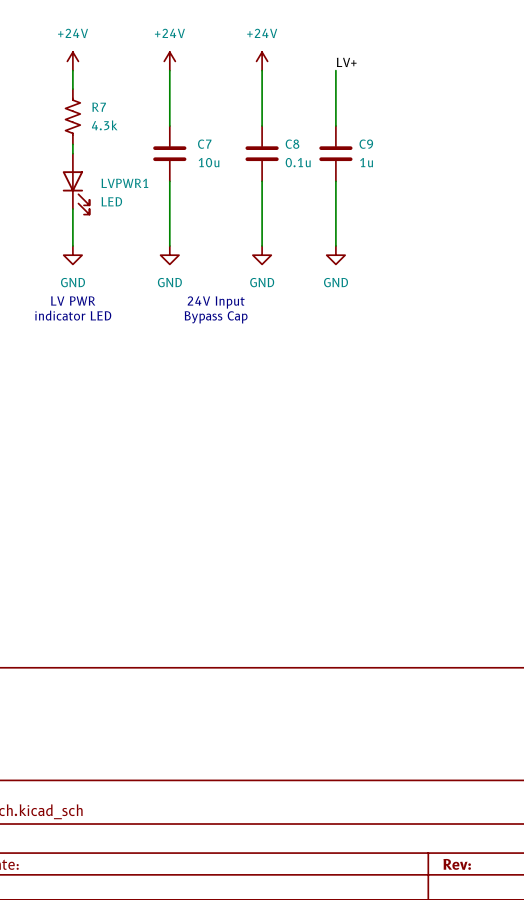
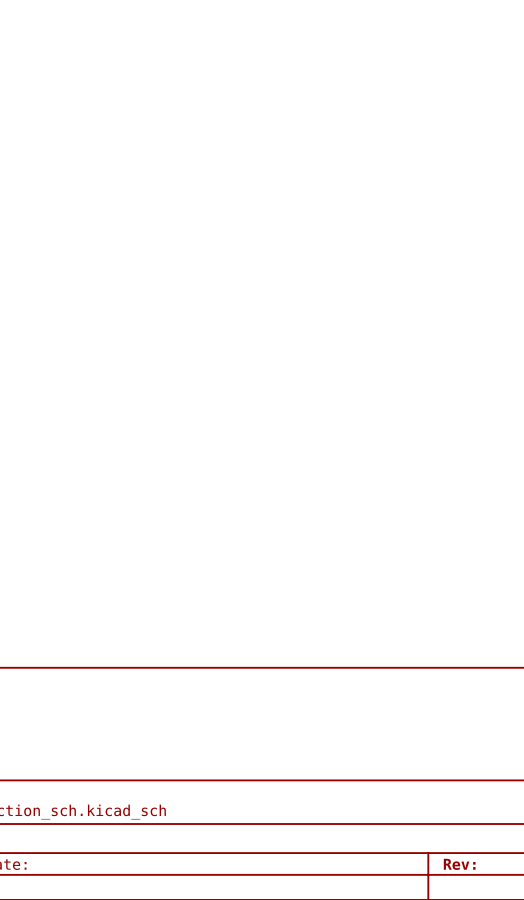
power symbol: +24V (72, 61) -> none
power symbol: +24V (169, 61) -> none
power symbol: +24V (262, 61) -> none
label: LV+ (346, 62) -> none
wire: (72, 70) (72, 89) -> none
wire: (169, 70) (169, 126) -> none
wire: (262, 70) (262, 126) -> none
wire: (335, 70) (335, 126) -> none
R7: 4.3k (72, 116) -> none
wire: (72, 144) (72, 153) -> none
C7: 10u (169, 153) -> none
C8: 0.1u (262, 153) -> none
C9: 1u (335, 153) -> none
wire: (169, 181) (169, 245) -> none
wire: (262, 181) (262, 245) -> none
wire: (335, 181) (335, 245) -> none
LVPWR1: LED (76, 184) -> none
wire: (72, 209) (72, 245) -> none
power symbol: GND (72, 255) -> none
power symbol: GND (169, 255) -> none
power symbol: GND (262, 255) -> none
power symbol: GND (335, 255) -> none
text: LV PWR (73, 301) -> none
text: 24V Input (216, 302) -> none
text: indicator LED (73, 315) -> none
text: Bypass Cap (216, 317) -> none

